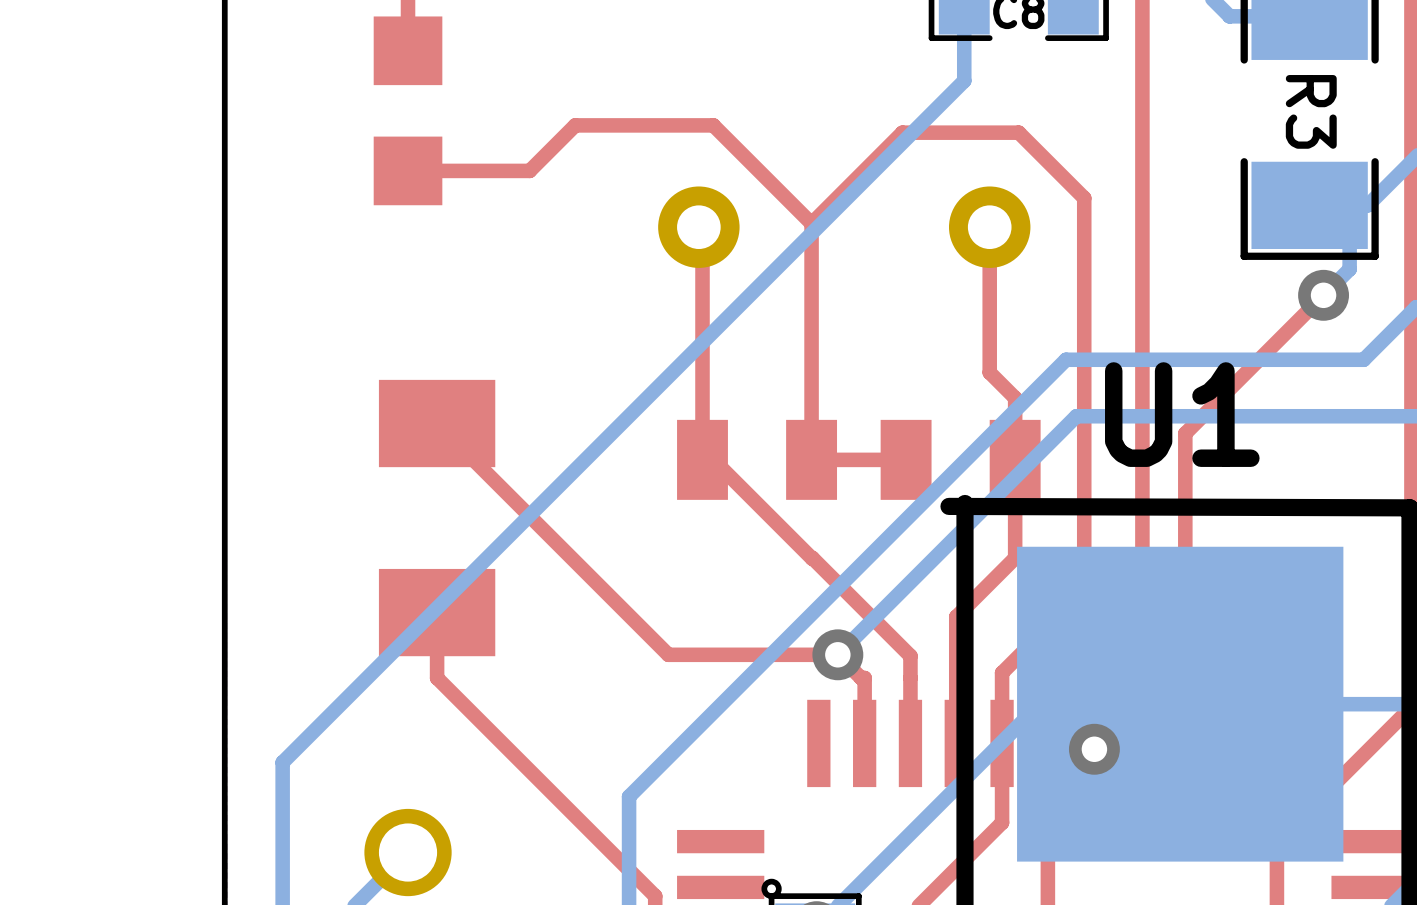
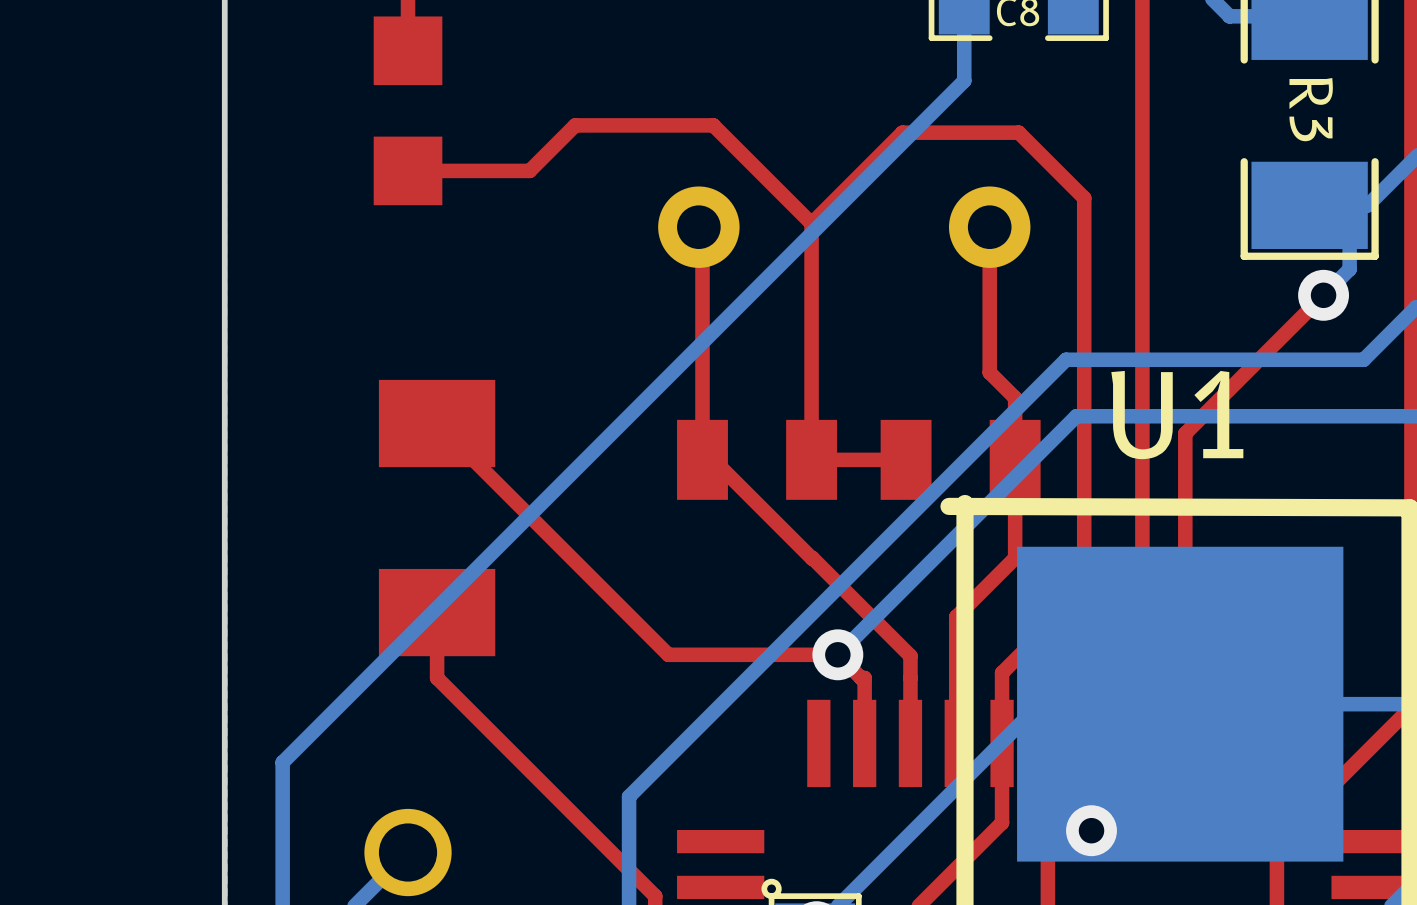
via position: (1094, 749) -> (1091, 830)

